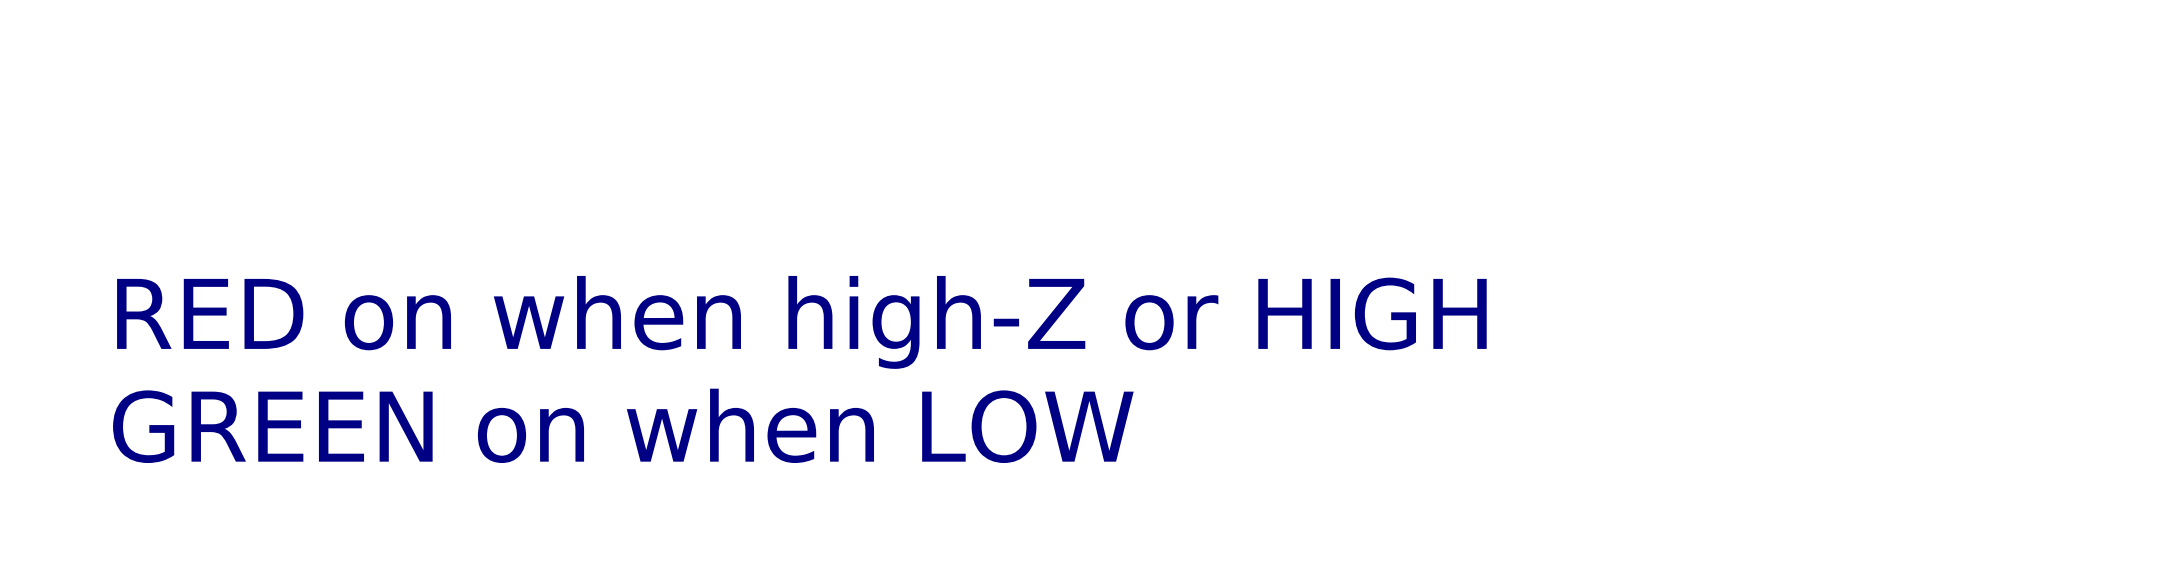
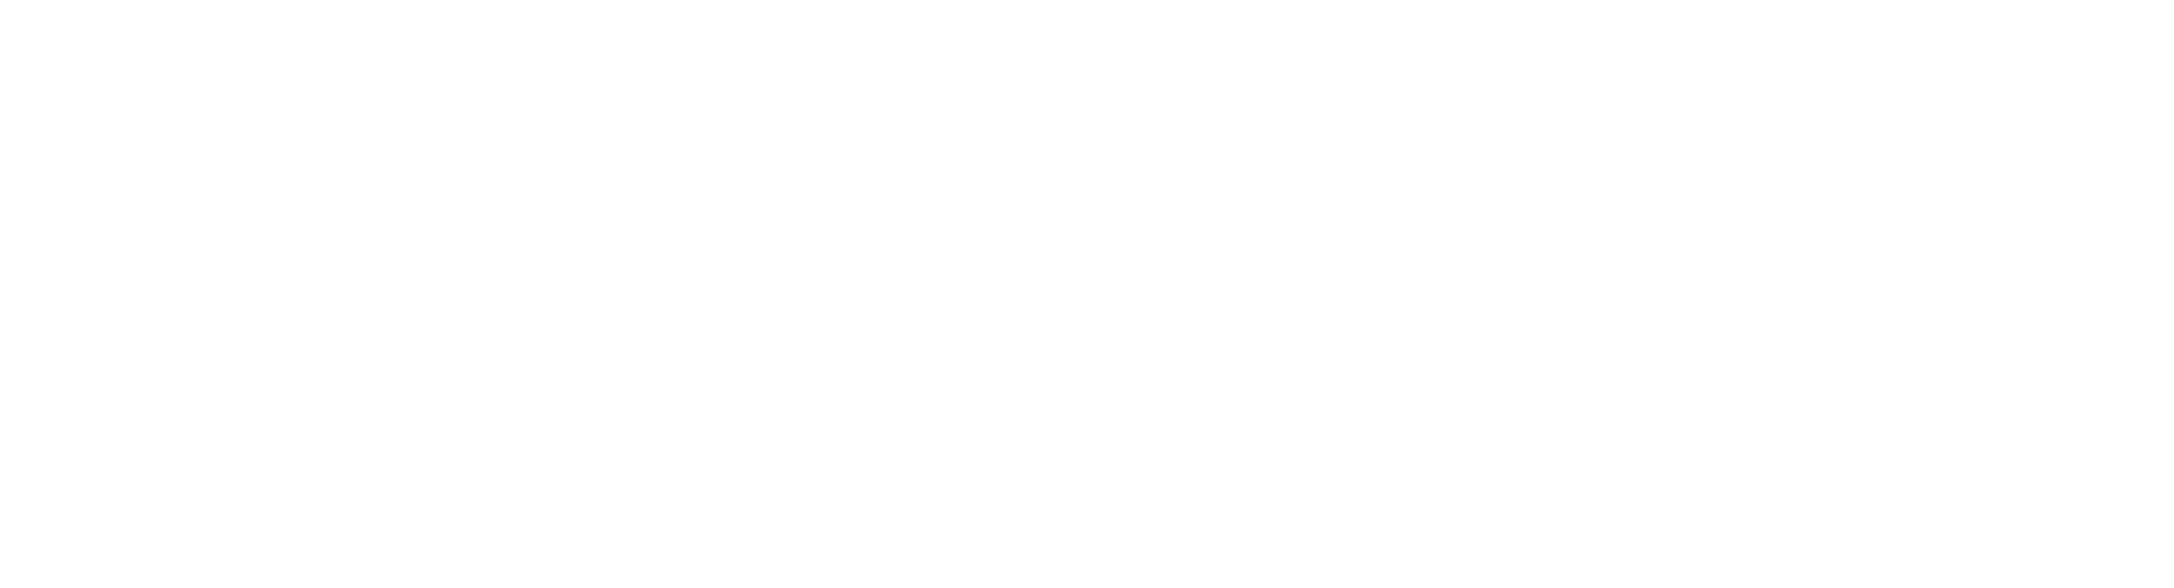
text: RED on when high-Z or HIGH (801, 322) -> none
text: GREEN on when LOW (623, 425) -> none

